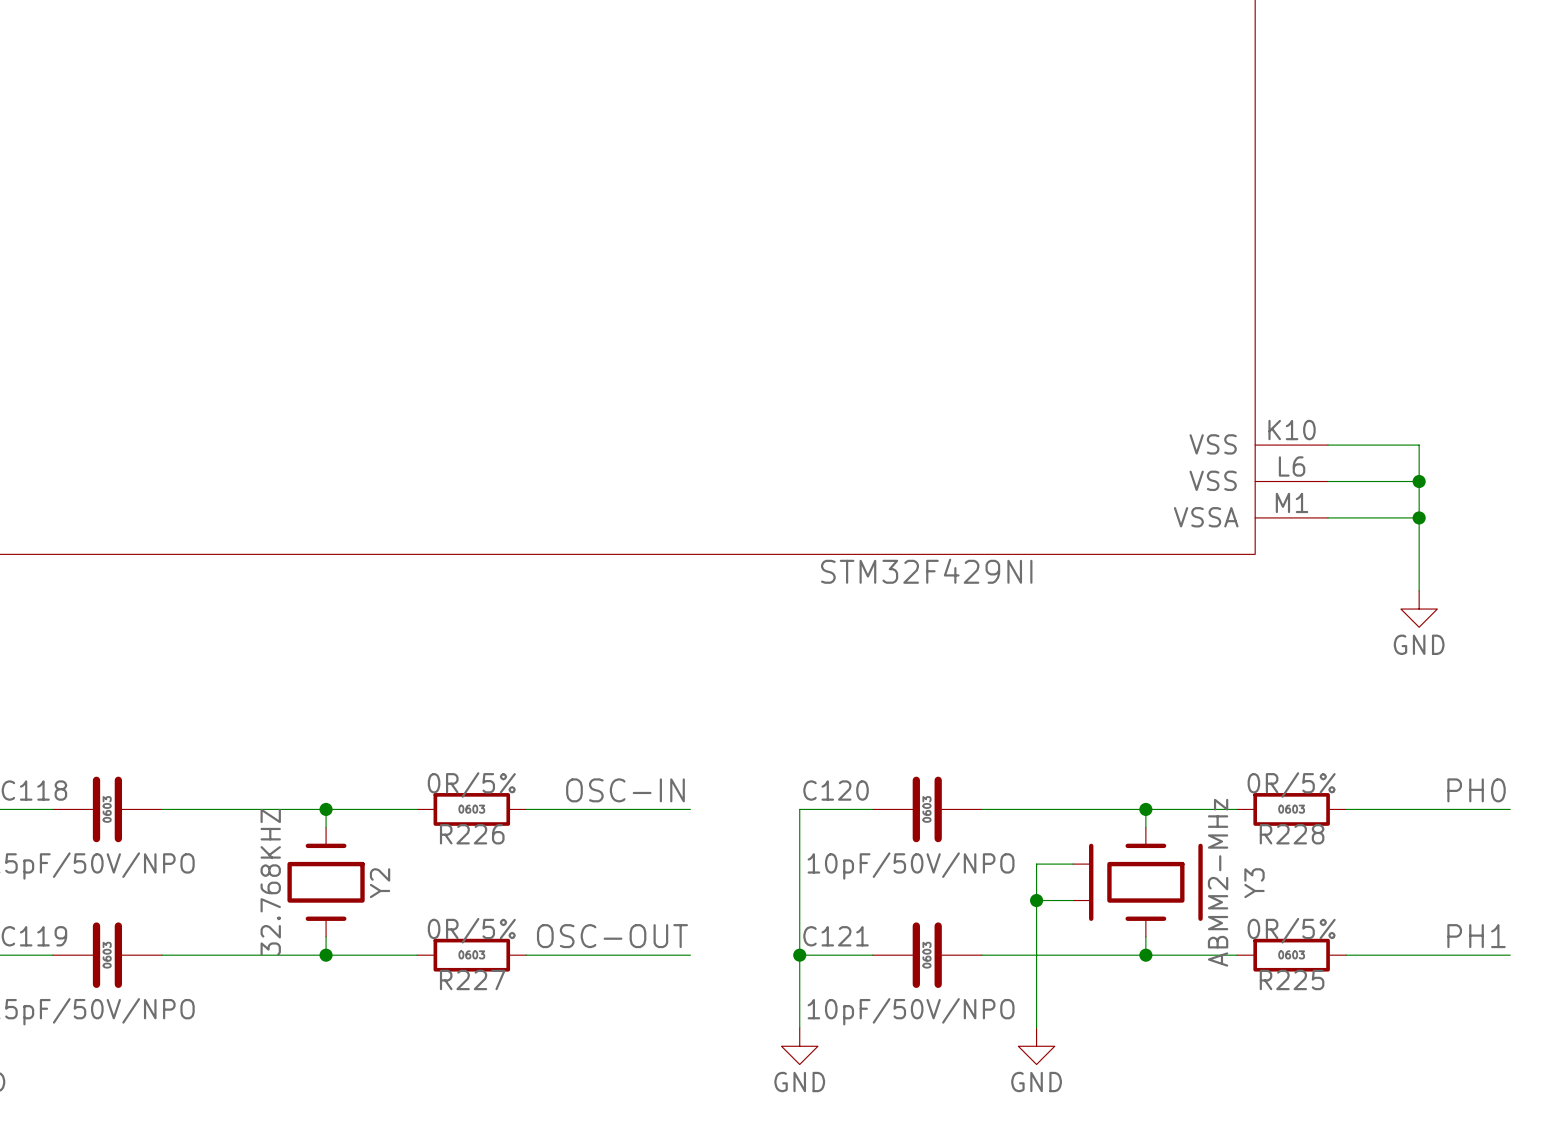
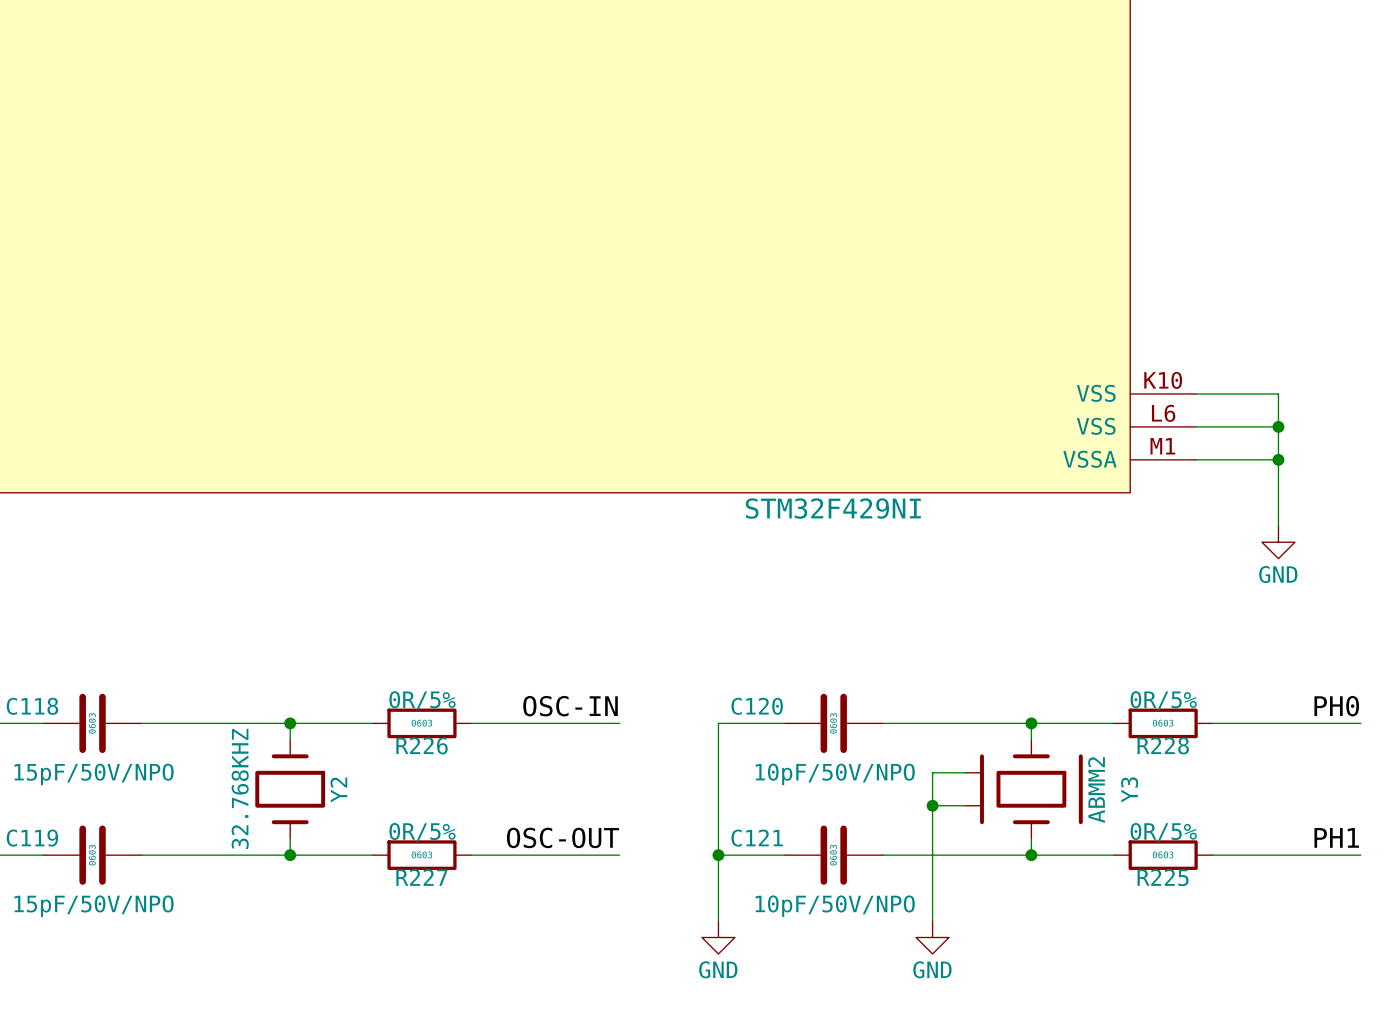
Y3 value: ABMM2-MHz (1218, 882) -> ABMM2 (1096, 790)

